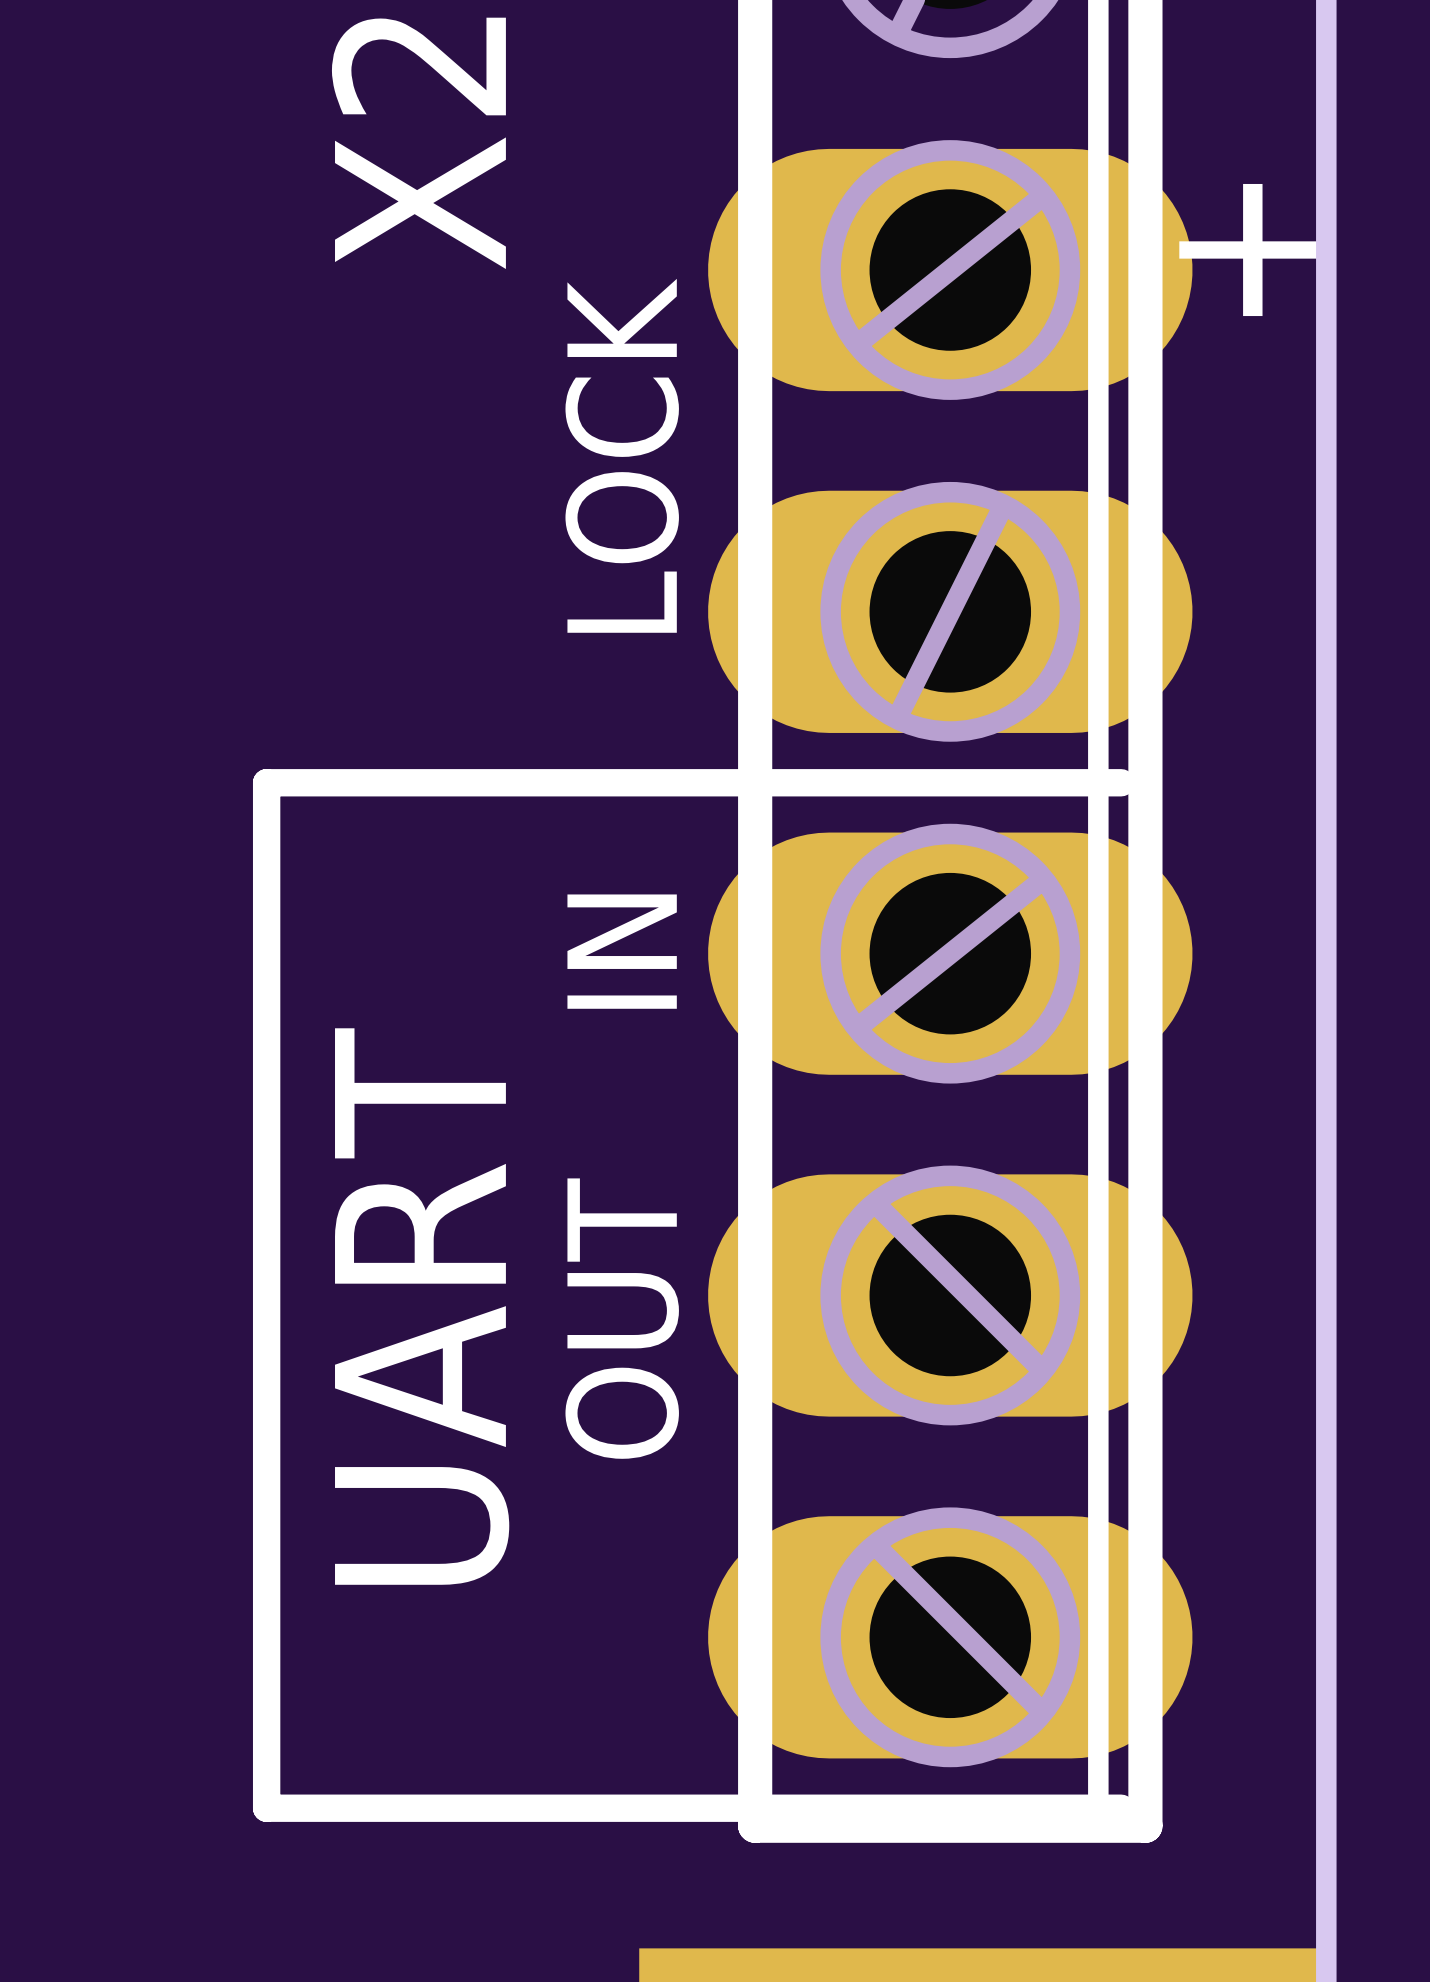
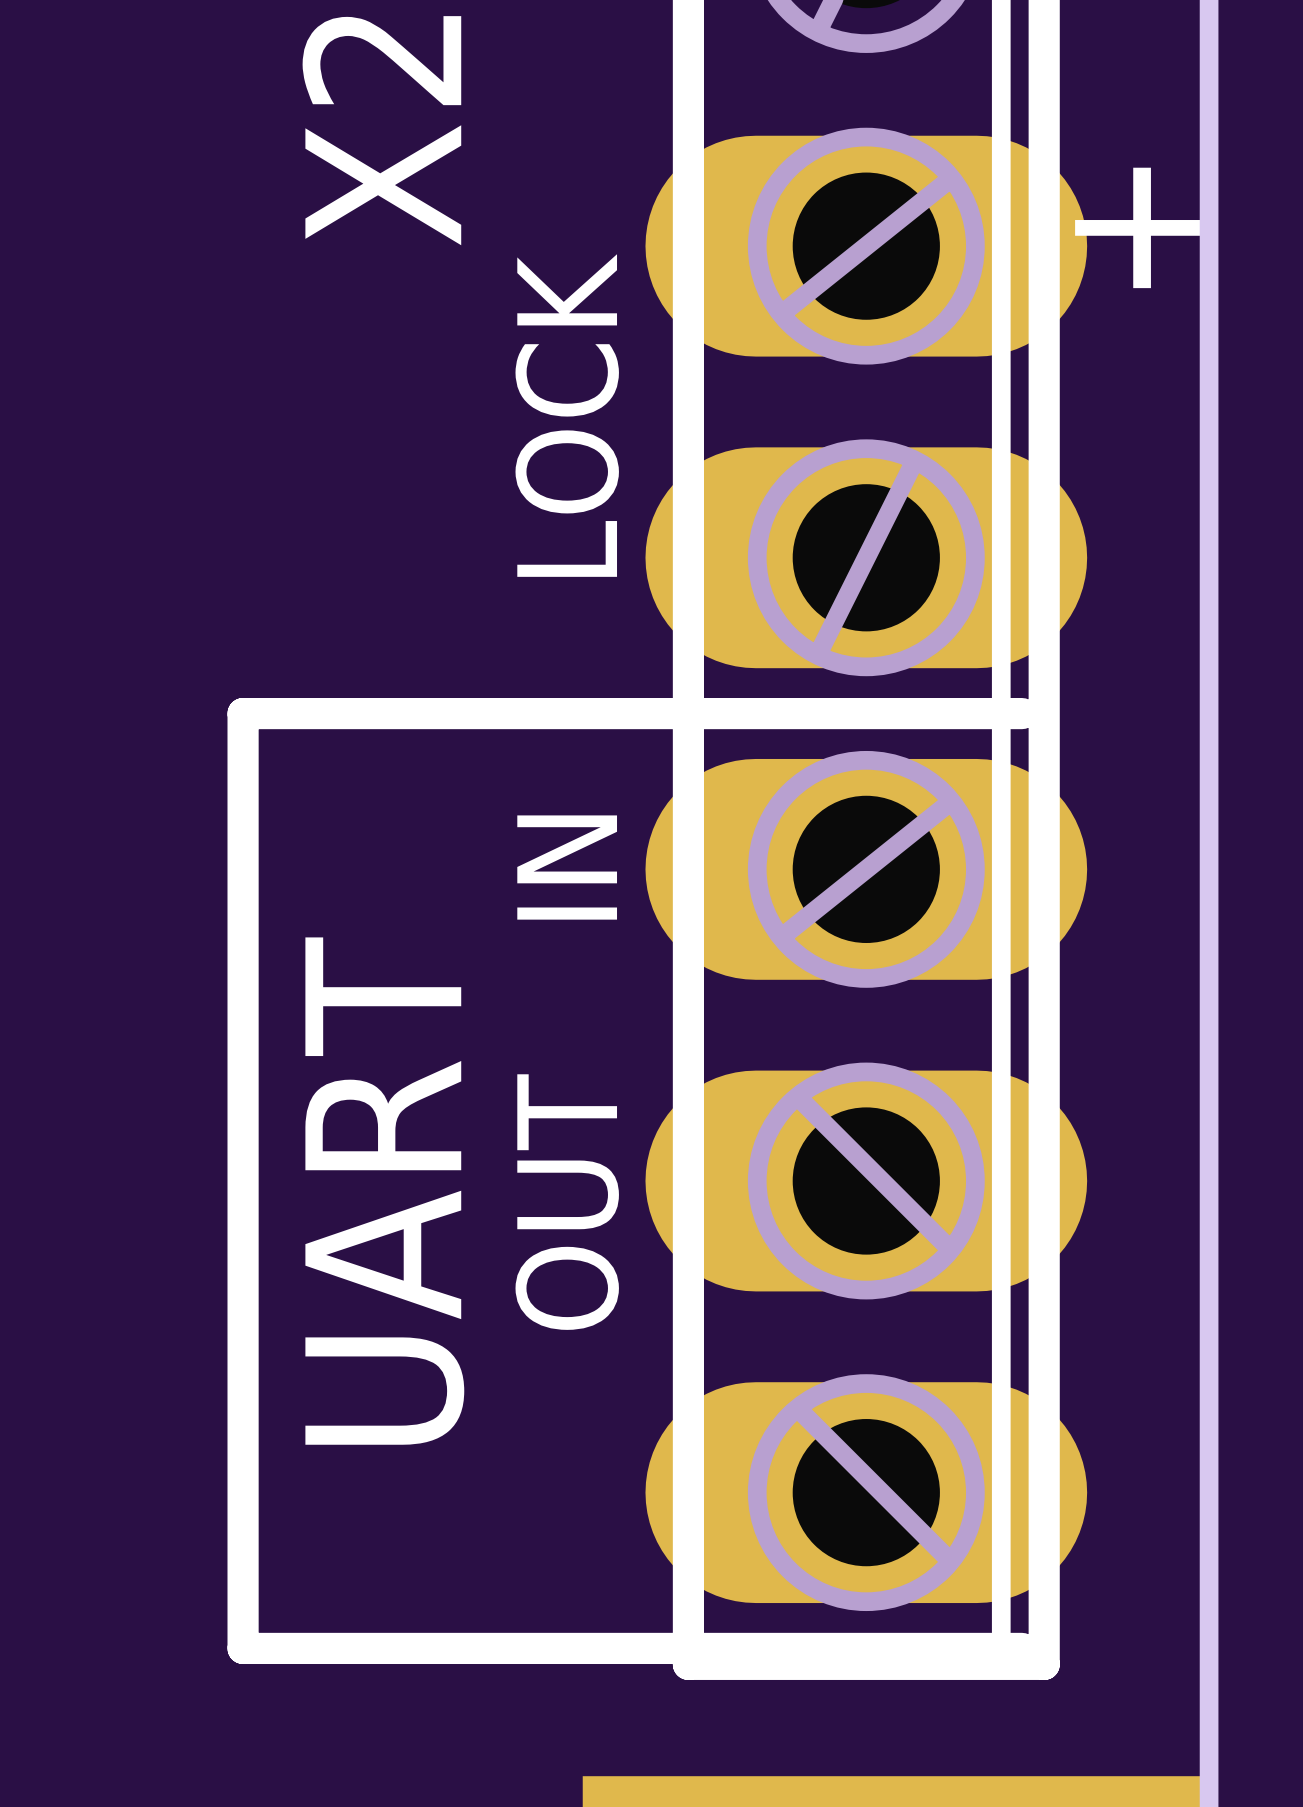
line width: thin (1121, 782) (266, 782) (266, 1808) (1121, 1808) -> thick (1022, 713) (243, 713) (243, 1648) (1022, 1648)

